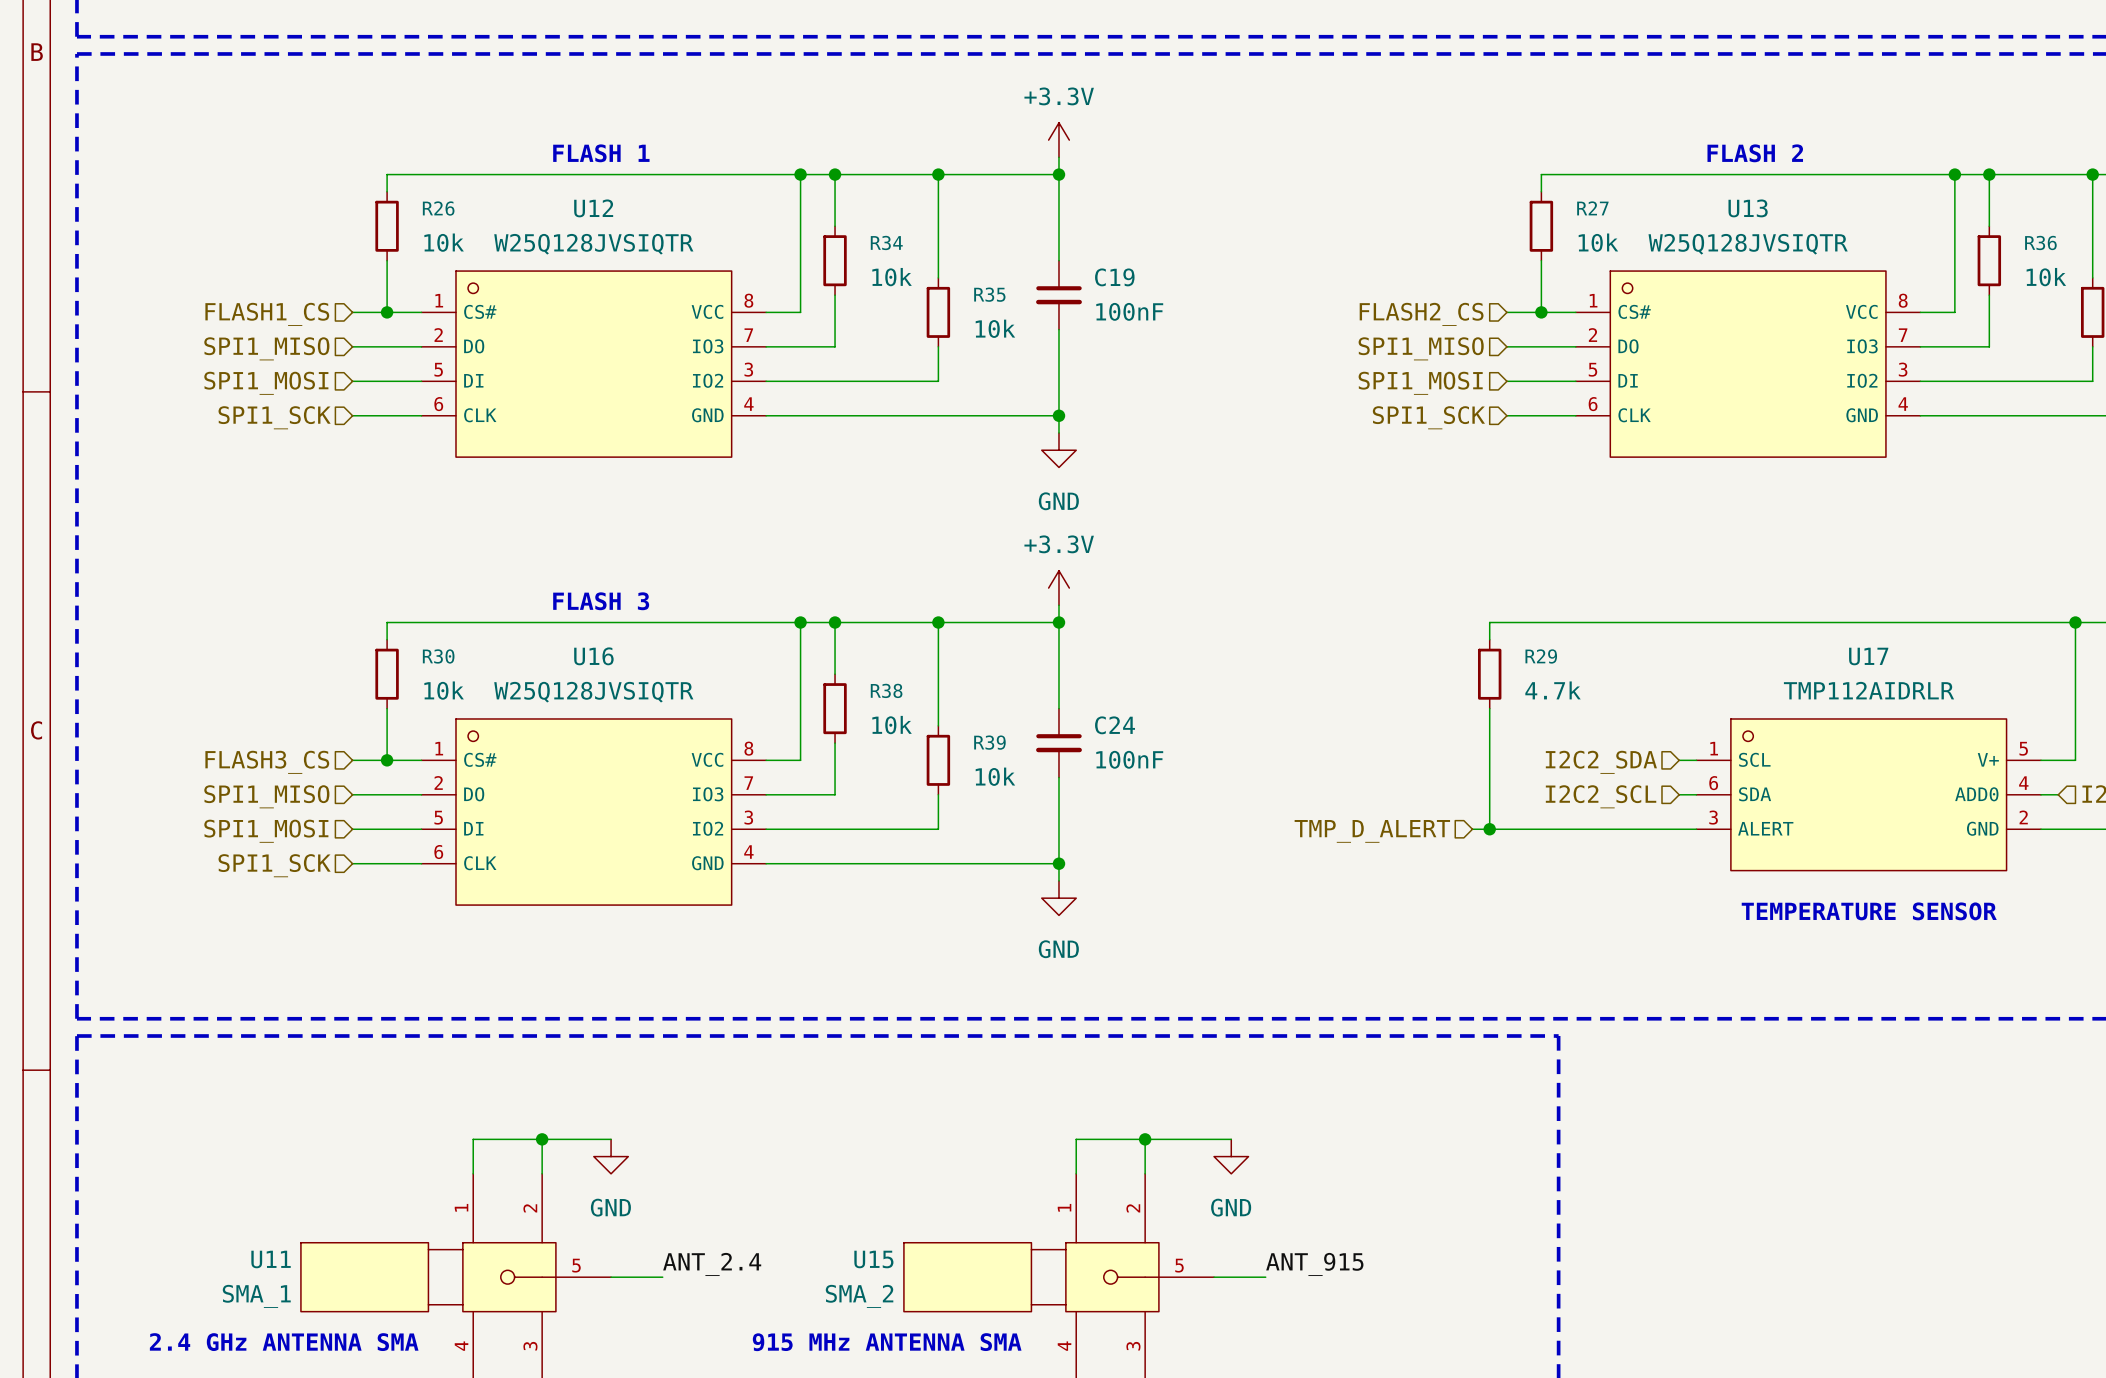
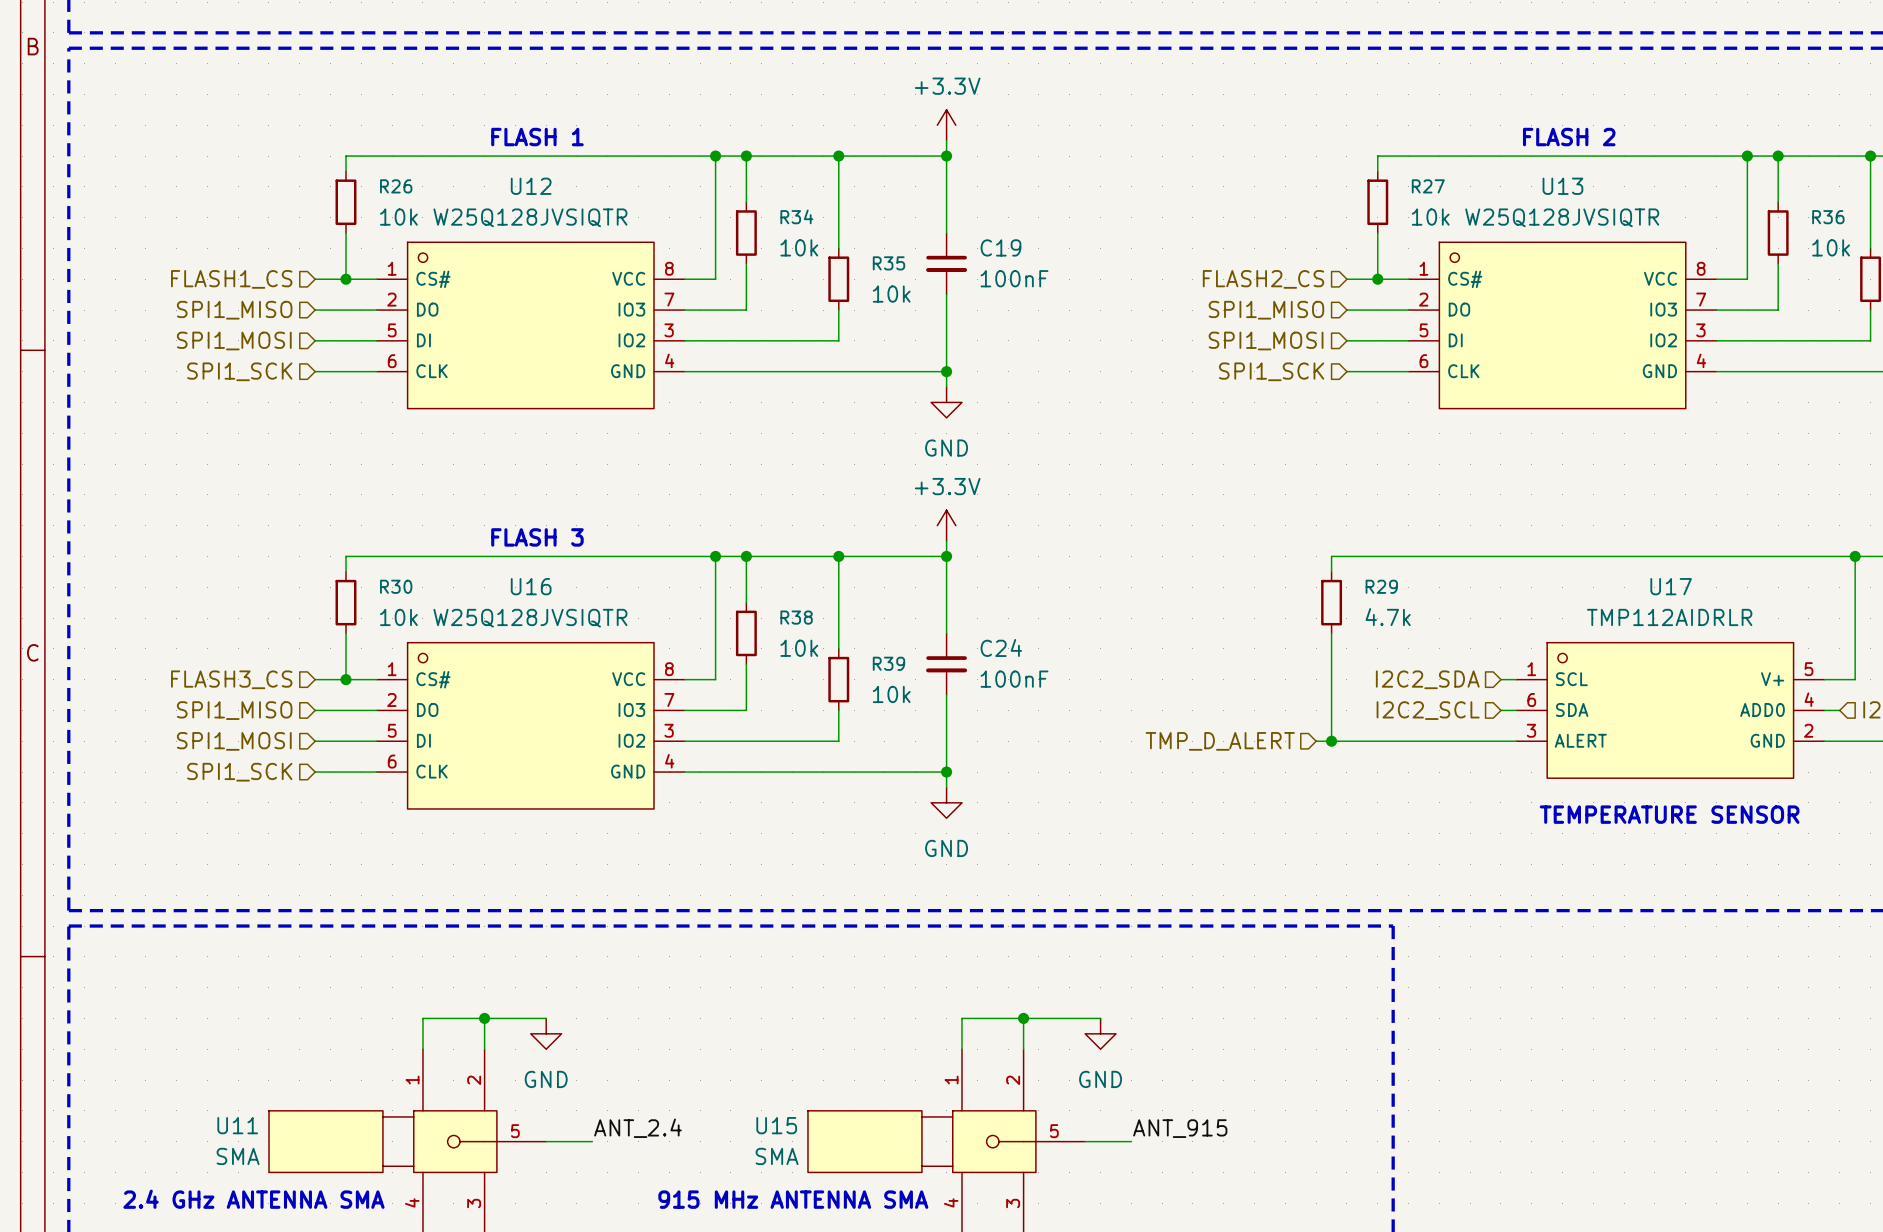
U11 value: SMA_1 (256, 1296) -> SMA (238, 1156)
U15 value: SMA_2 (859, 1296) -> SMA (777, 1156)

